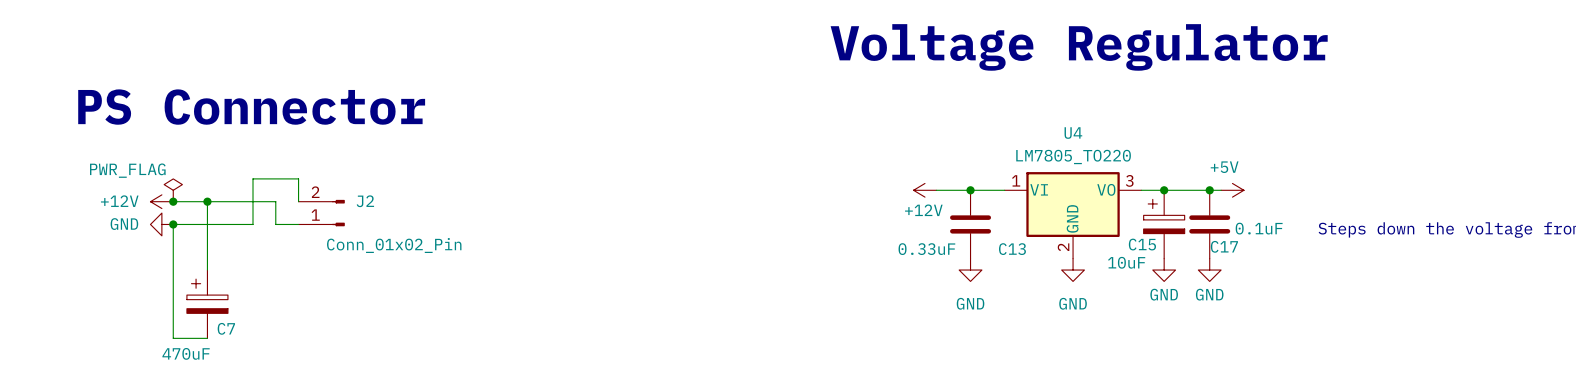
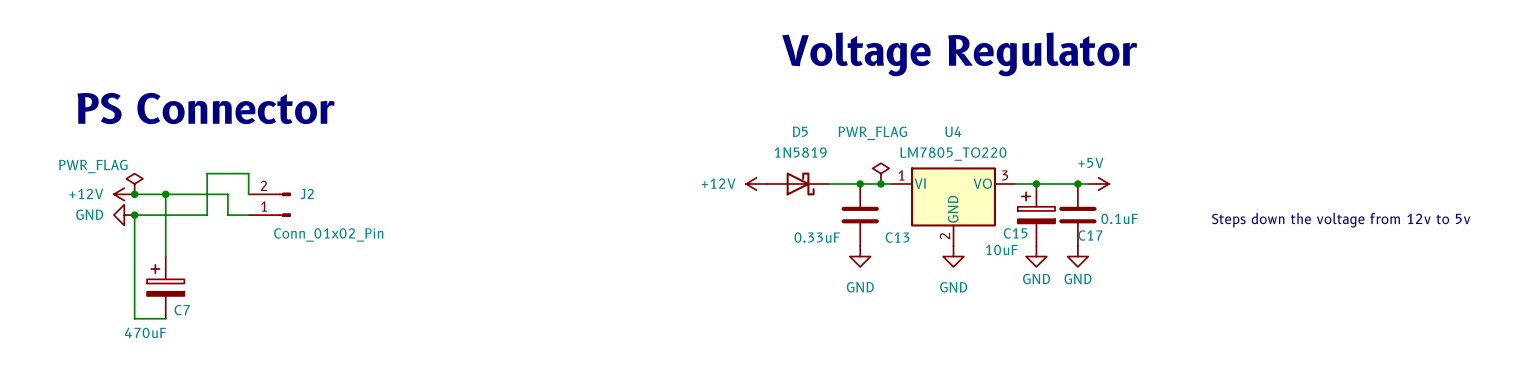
power symbol: none -> PWR_FLAG (880, 173)
D5: none -> 1N5819 (798, 183)
power symbol position: +12V (924, 190) -> +12V (756, 183)
junction: none -> (880, 183)
power symbol text position: +12V (923, 210) -> +12V (718, 183)

